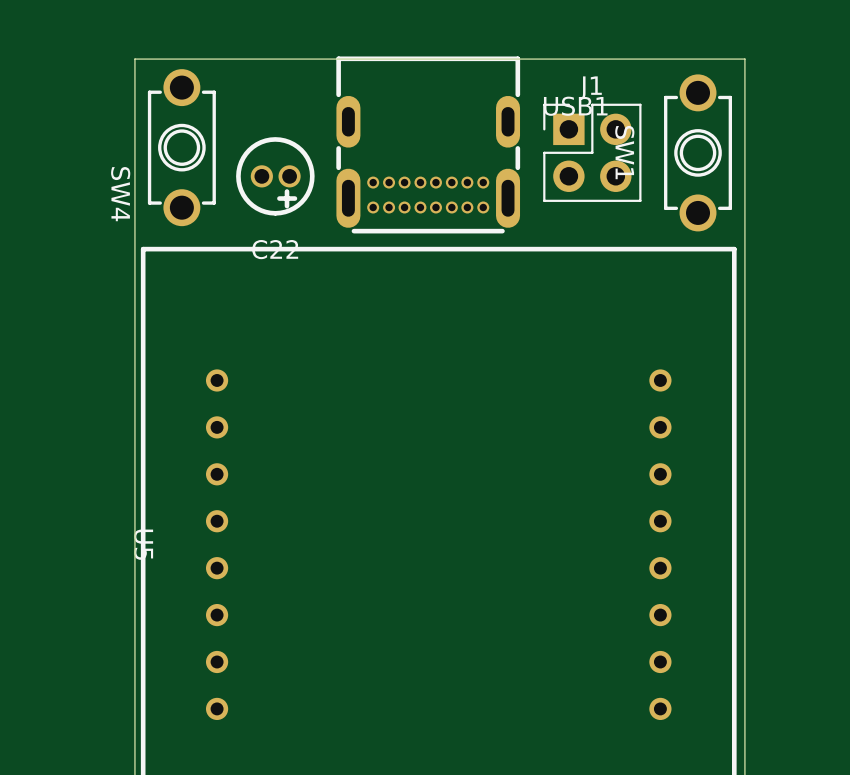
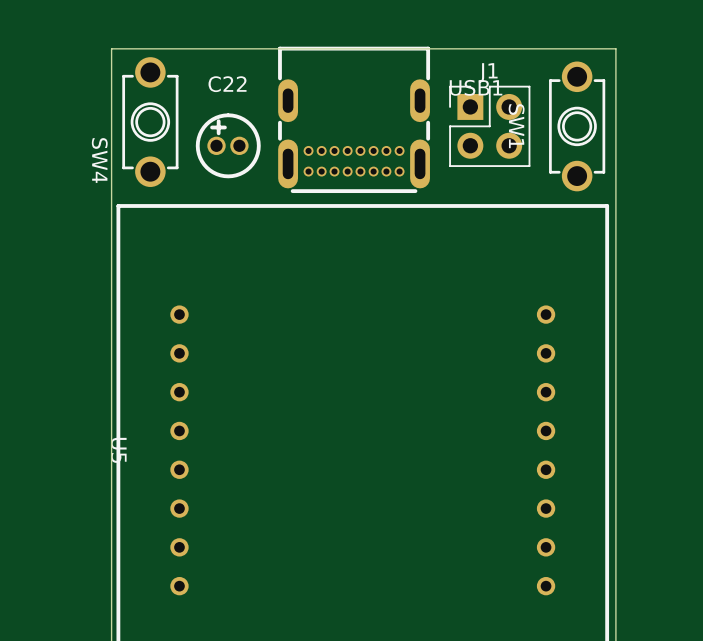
C22 rotation: 0° (275, 176) -> 180° (228, 145)

